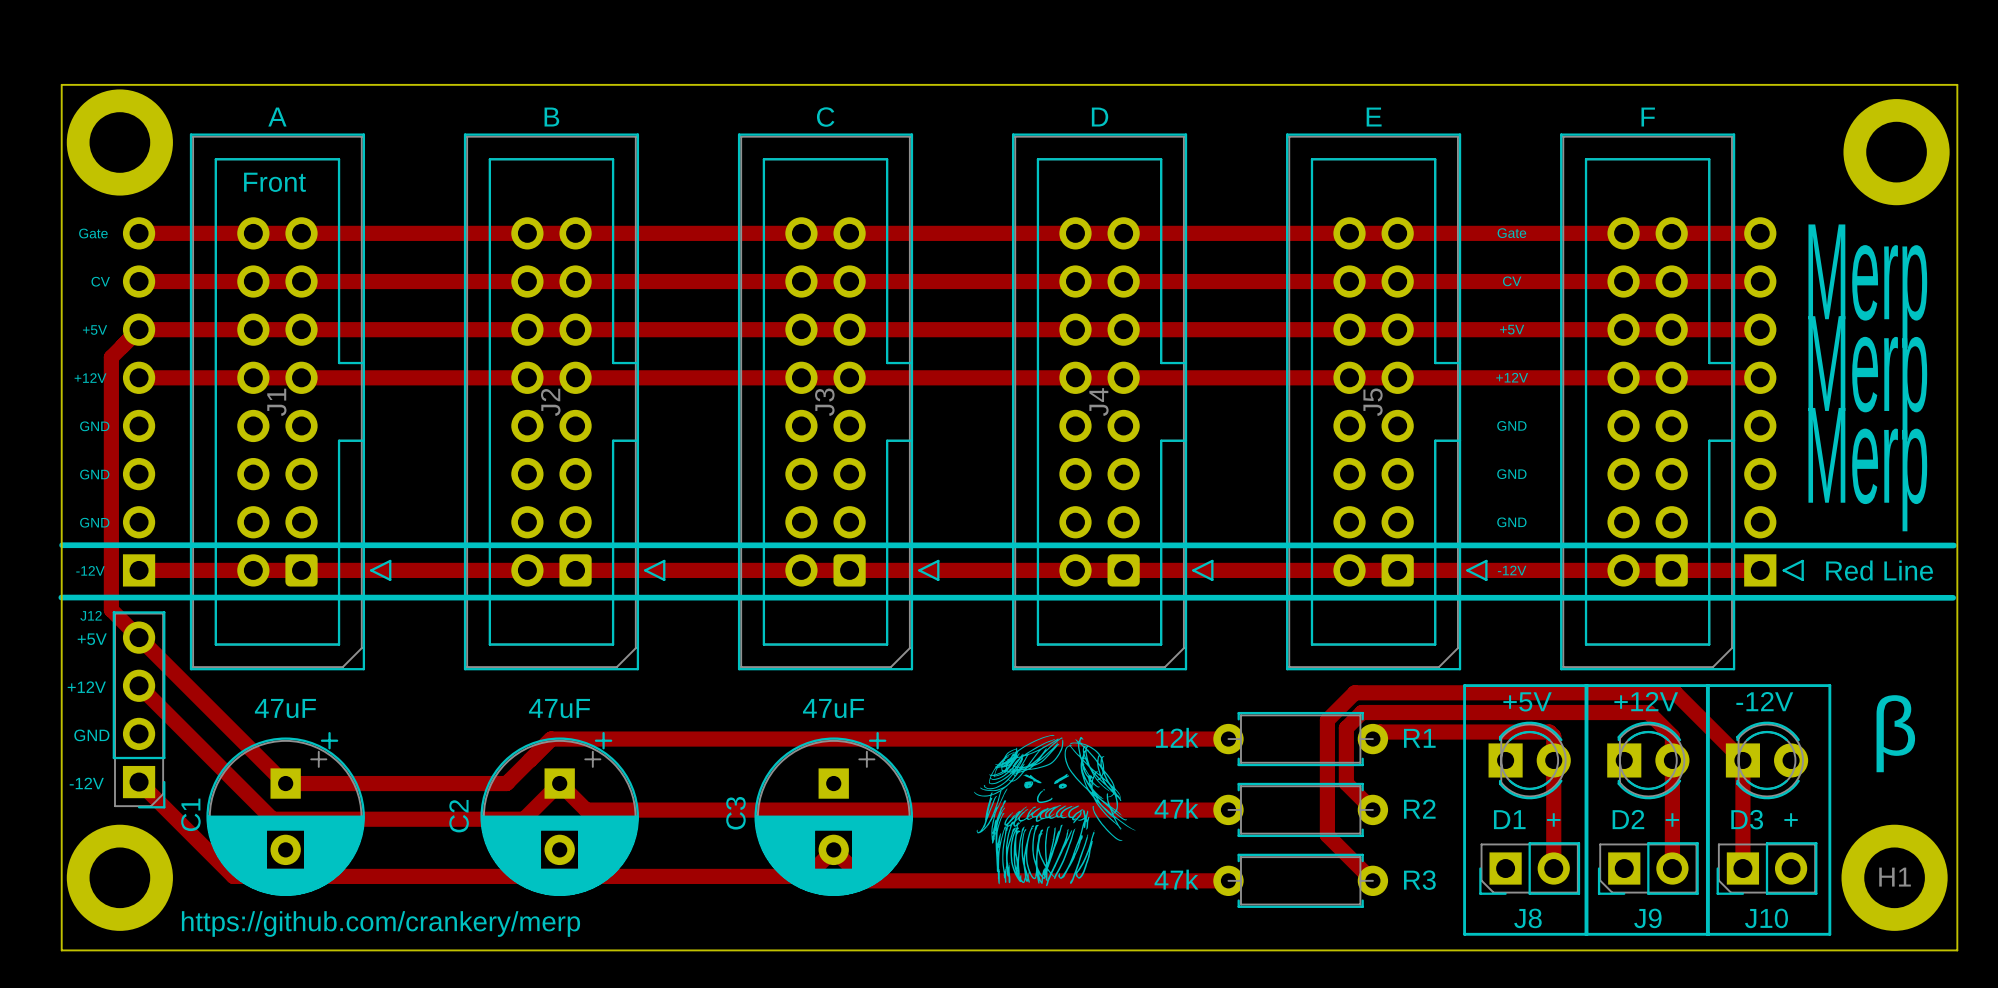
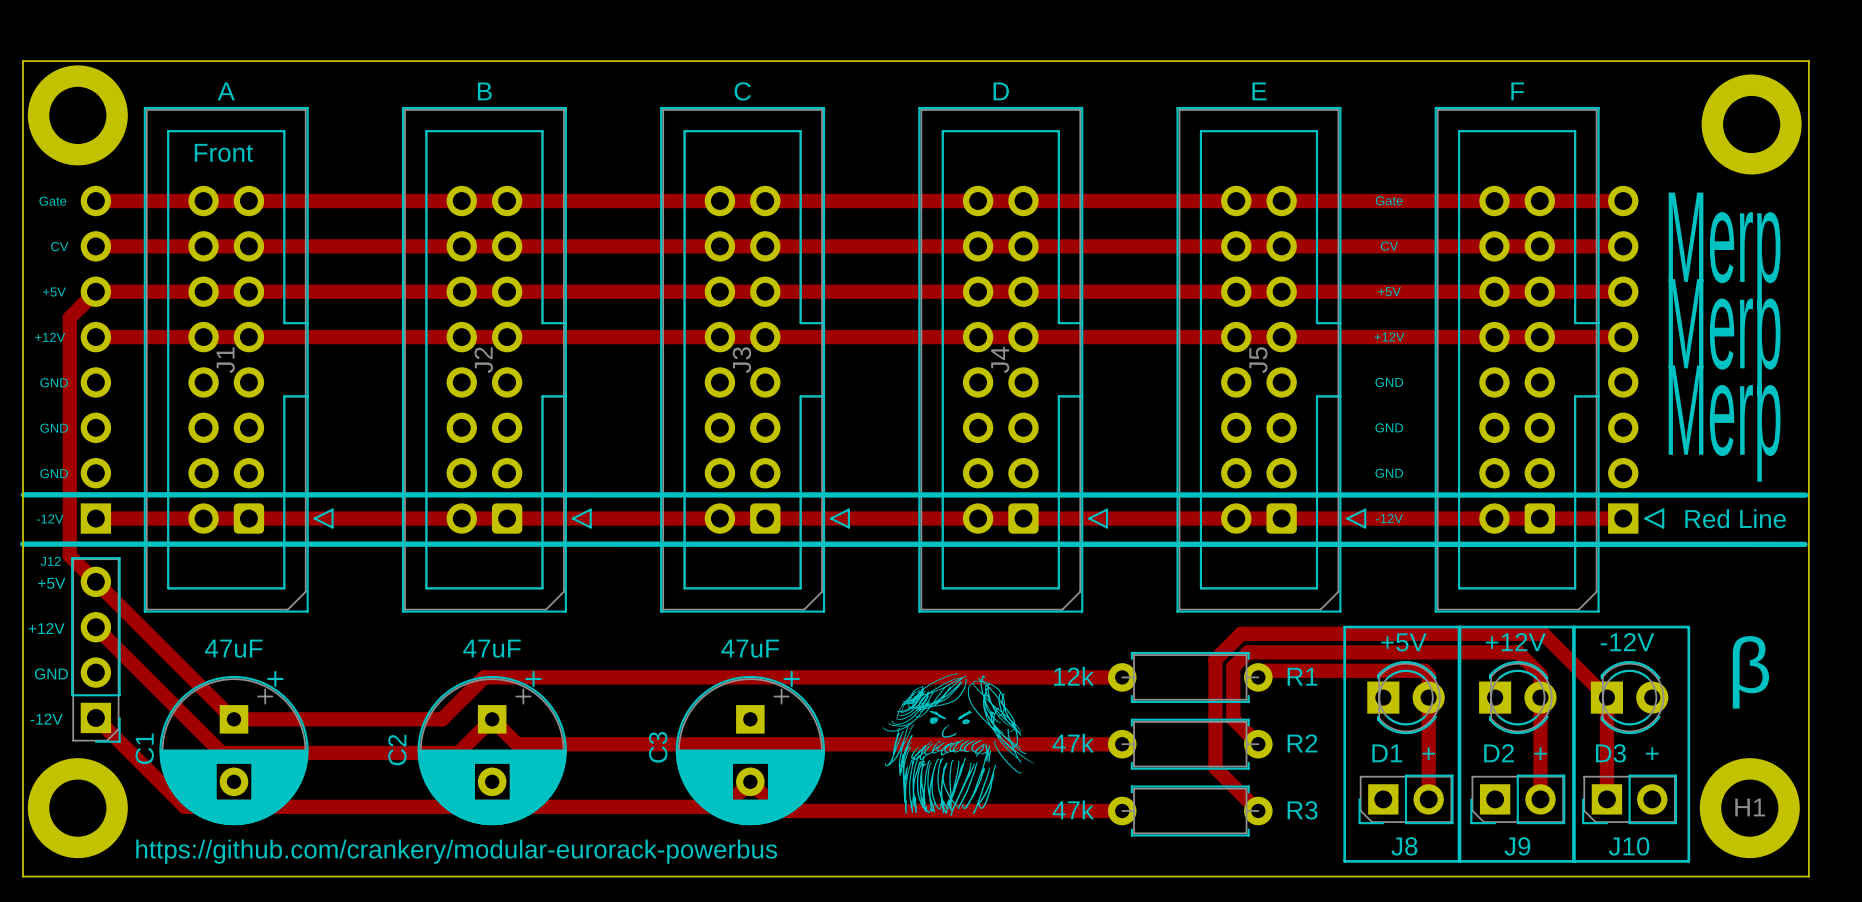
text: https://github.com/crankery/merp (380, 923) -> https://github.com/crankery/modular-eurorack-powerbus (456, 851)

